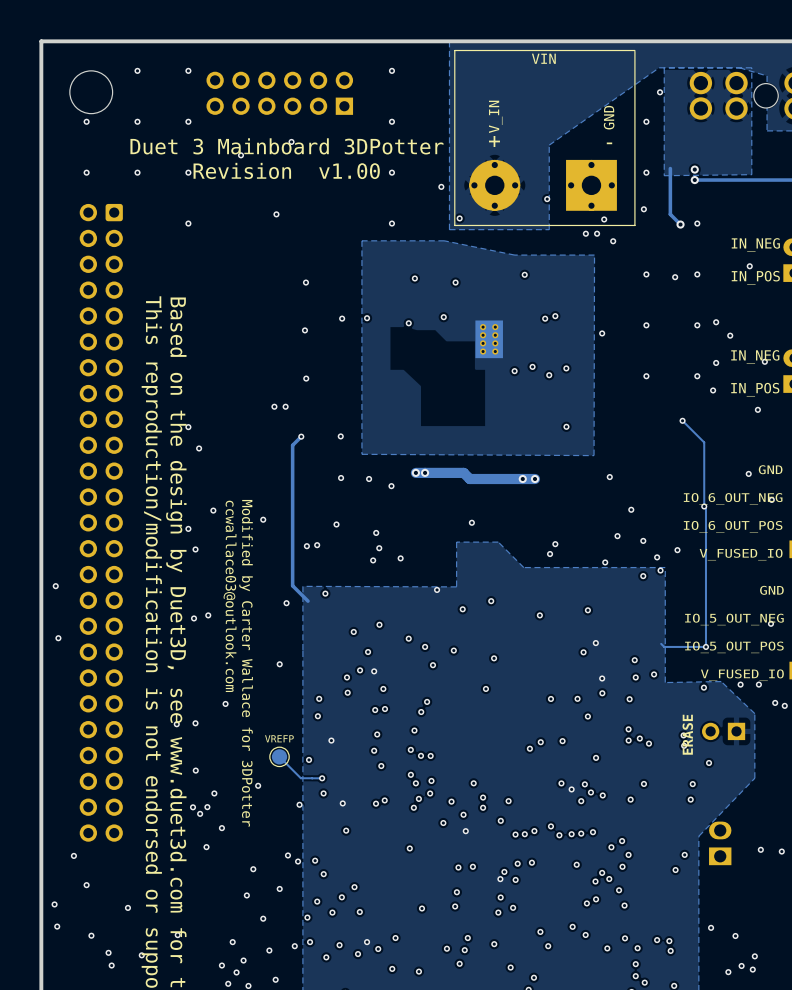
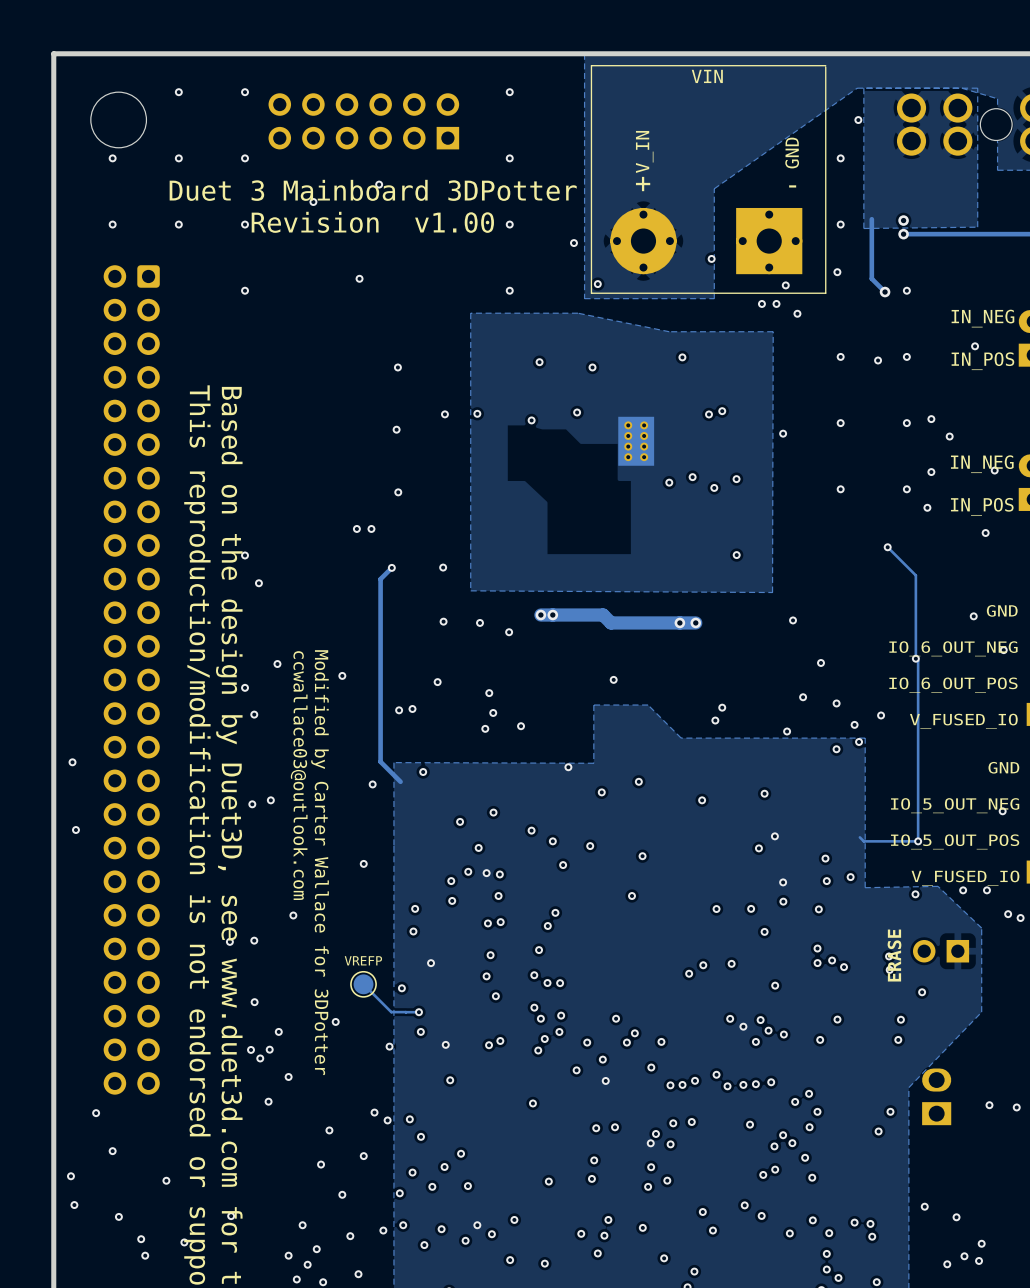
via: none -> (499, 874)
via: none -> (634, 1033)
via: (483, 797) -> none
via: none -> (626, 1042)
via: (483, 807) -> none

